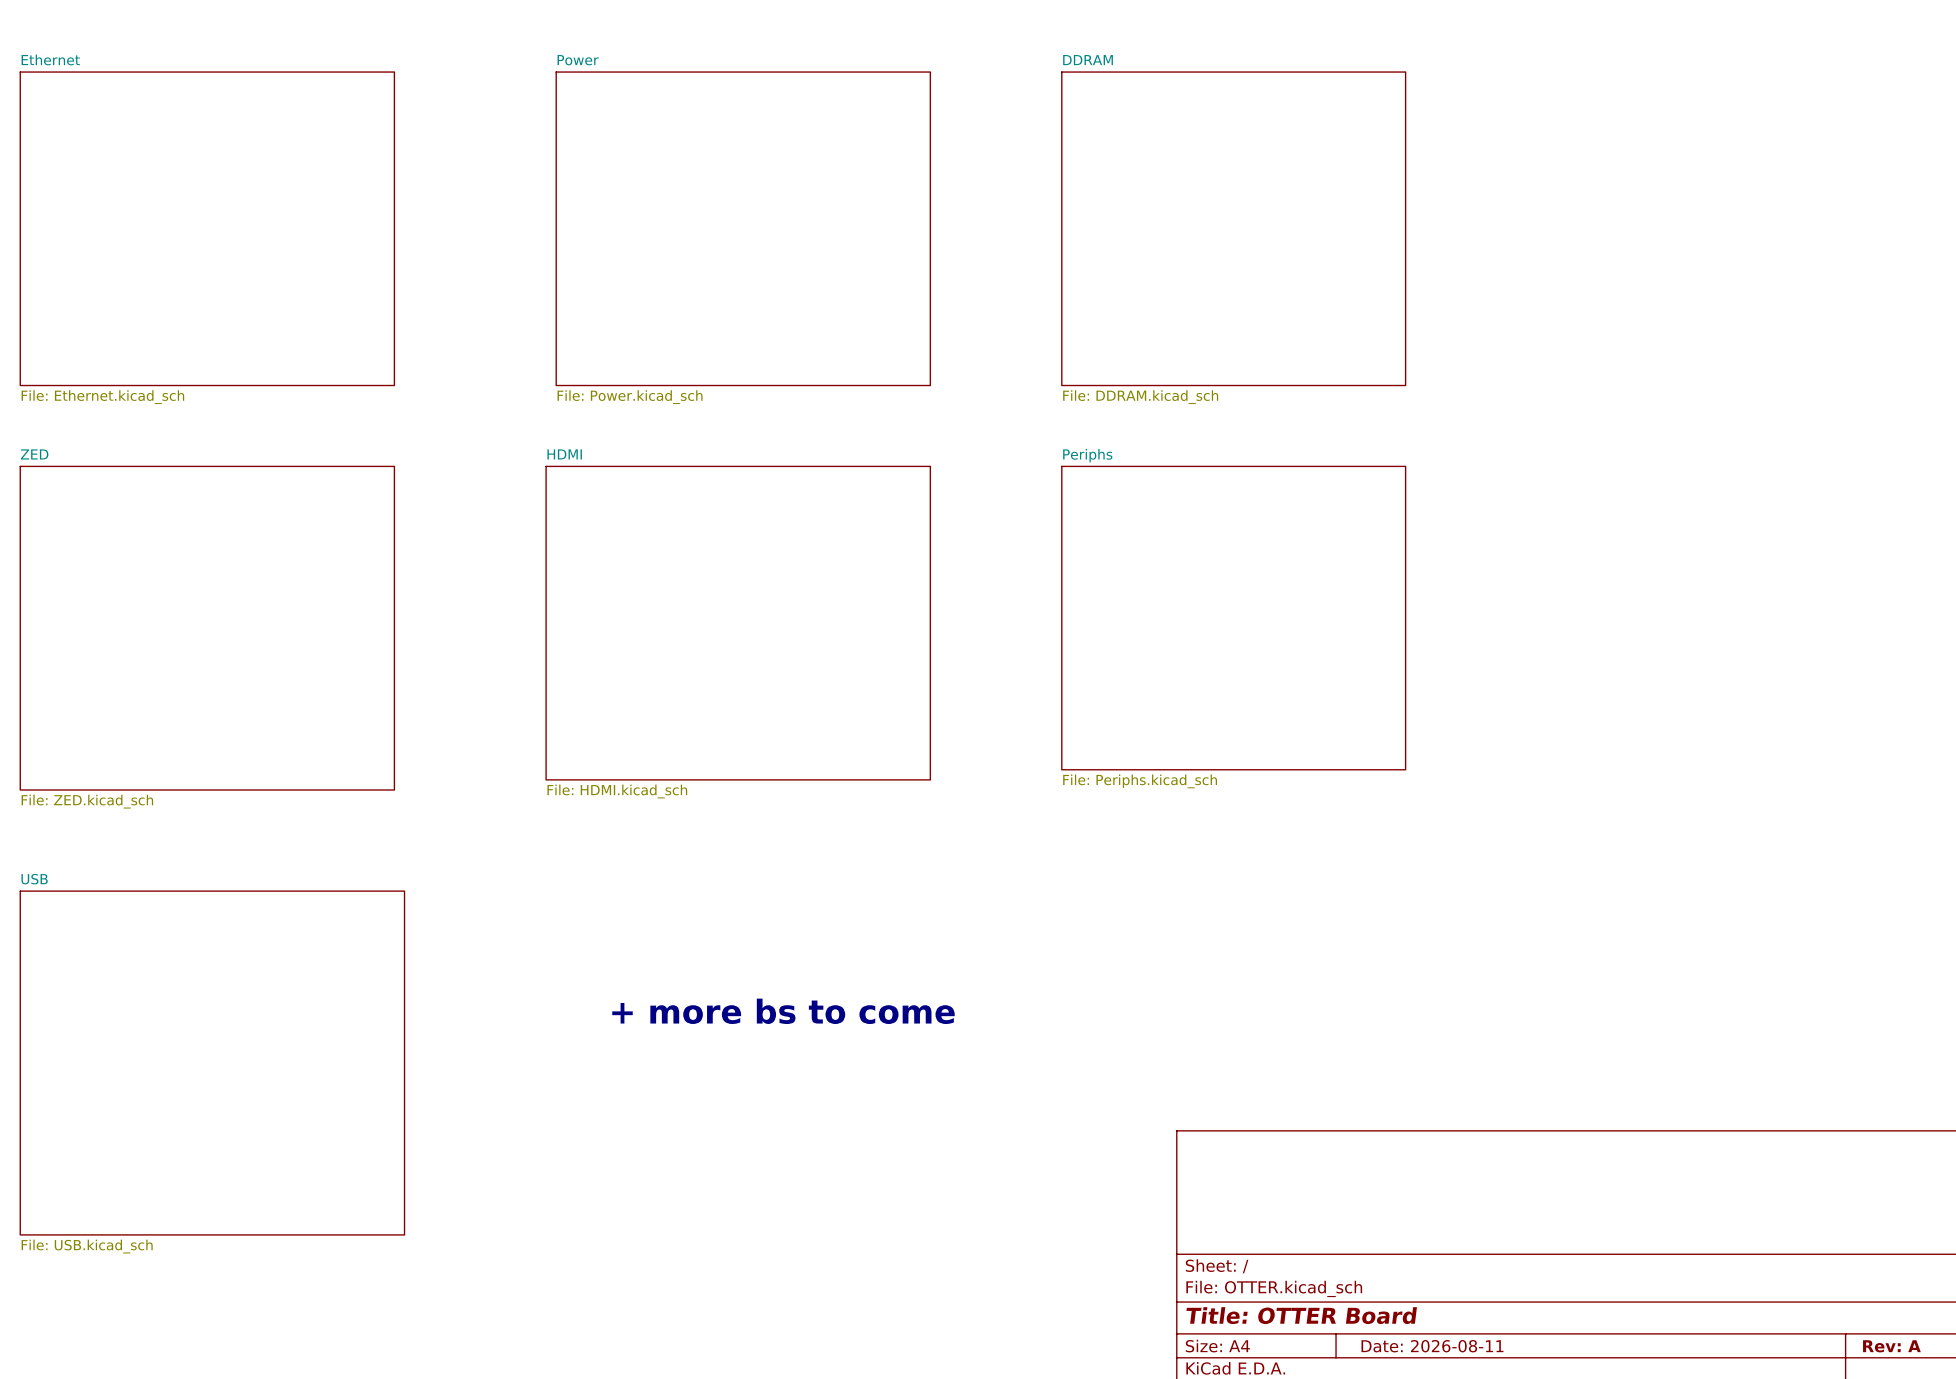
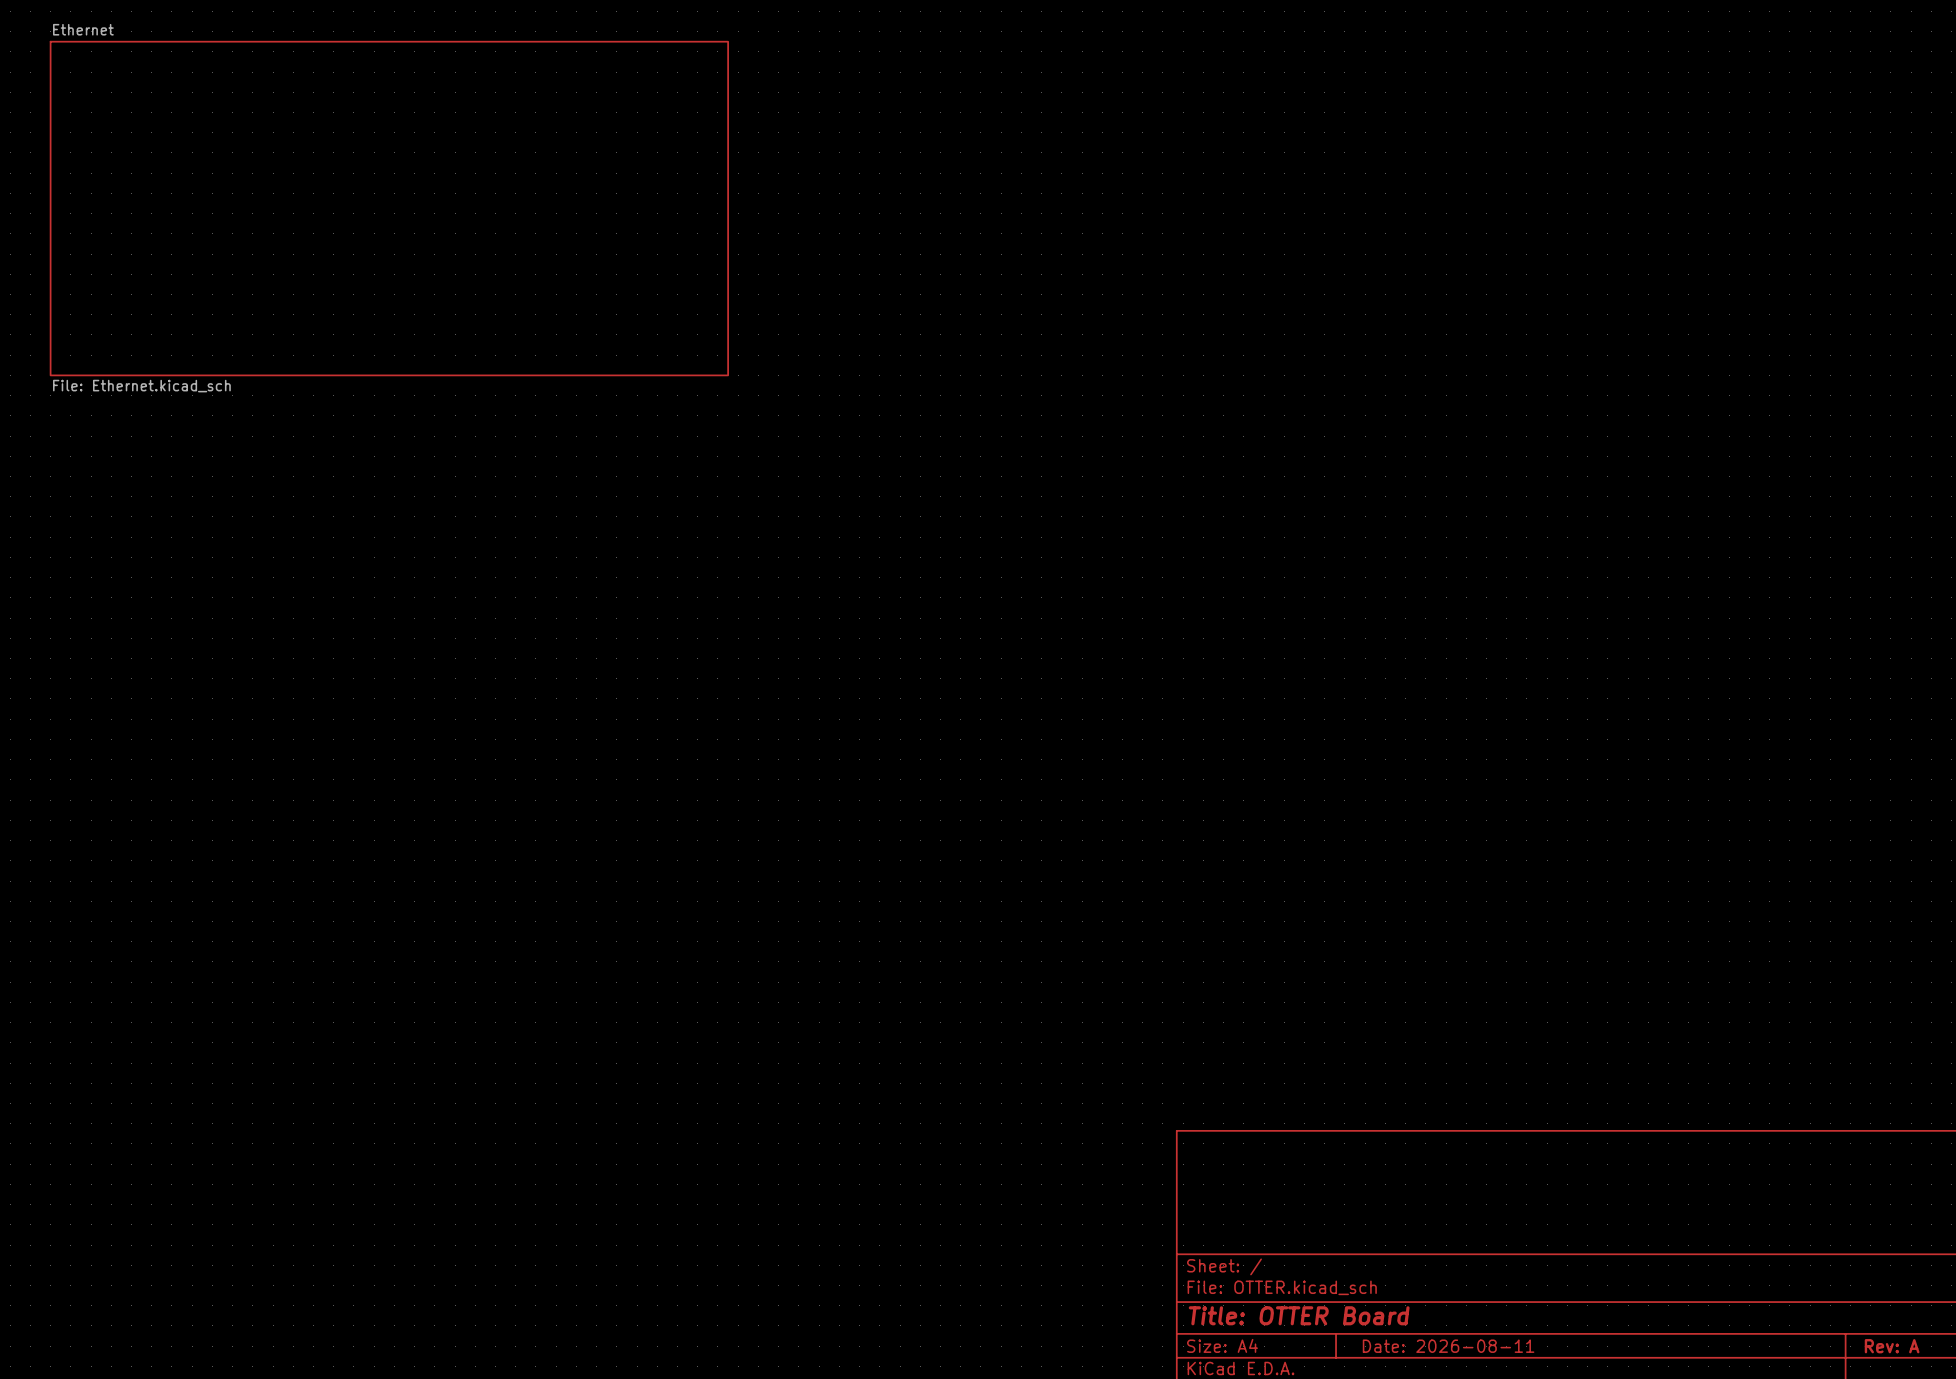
sheet Ethernet: none -> File: Ethernet.kicad_sch (389, 208)
sheet Ethernet: File: Ethernet.kicad_sch (207, 228) -> none
sheet Power: File: Power.kicad_sch (743, 228) -> none
sheet DDRAM: File: DDRAM.kicad_sch (1233, 228) -> none
sheet Periphs: File: Periphs.kicad_sch (1233, 618) -> none
sheet HDMI: File: HDMI.kicad_sch (738, 623) -> none
sheet ZED: File: ZED.kicad_sch (207, 628) -> none
text: + more bs to come (783, 1011) -> none
sheet USB: File: USB.kicad_sch (212, 1063) -> none

